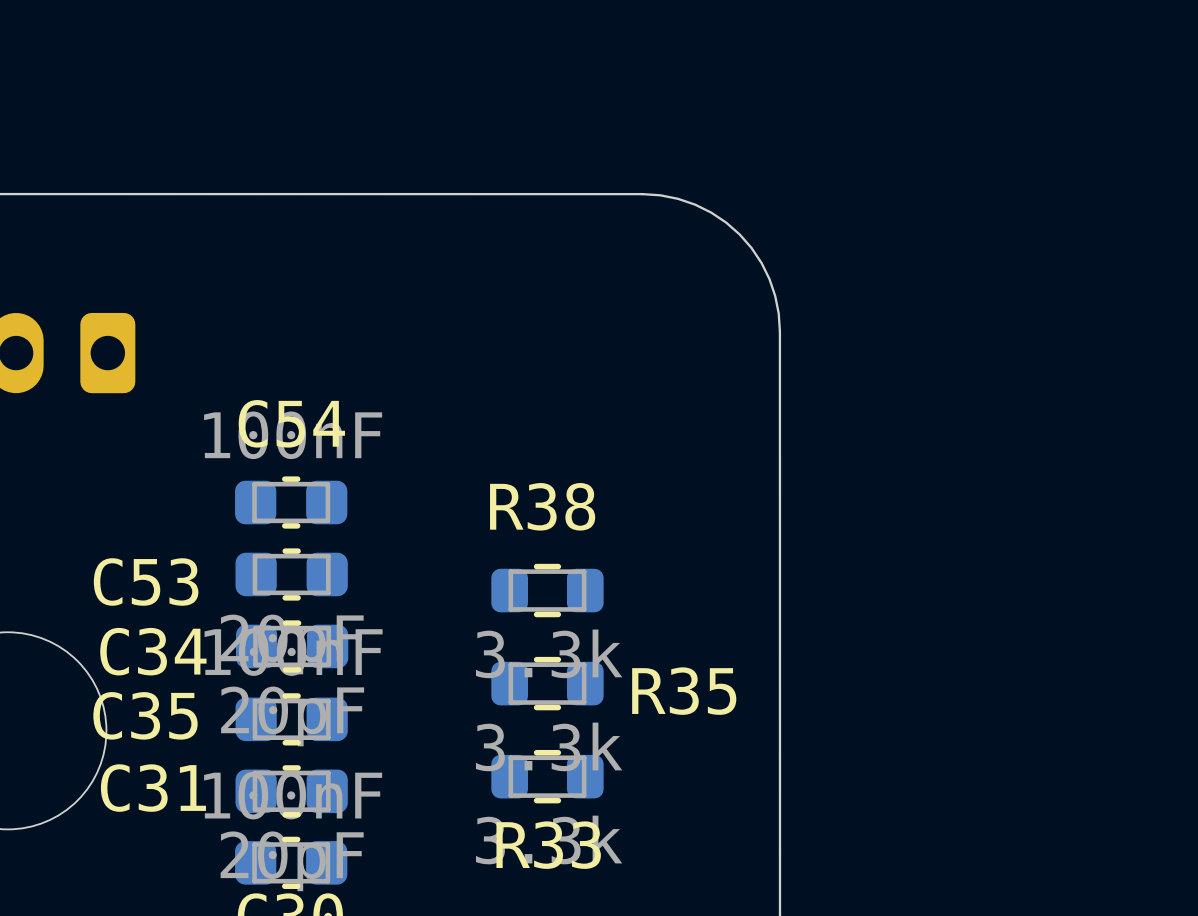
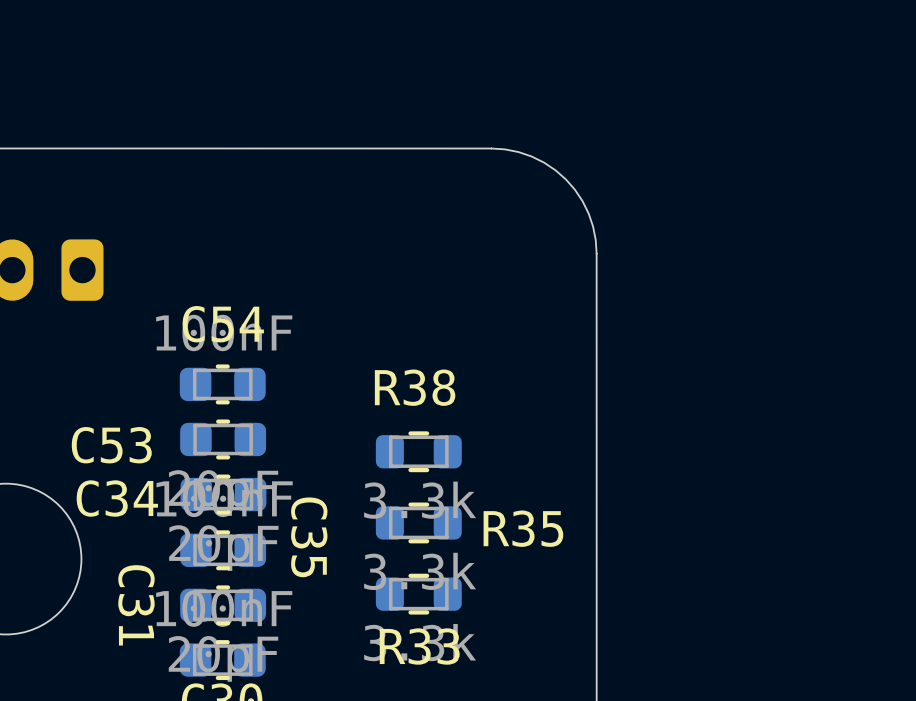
C35 name rotation: 0° (145, 715) -> 90° clockwise (309, 537)
C35 name position: C35 (145, 715) -> C35 (309, 537)
C31 name rotation: 0° (153, 788) -> 90° clockwise (136, 605)

